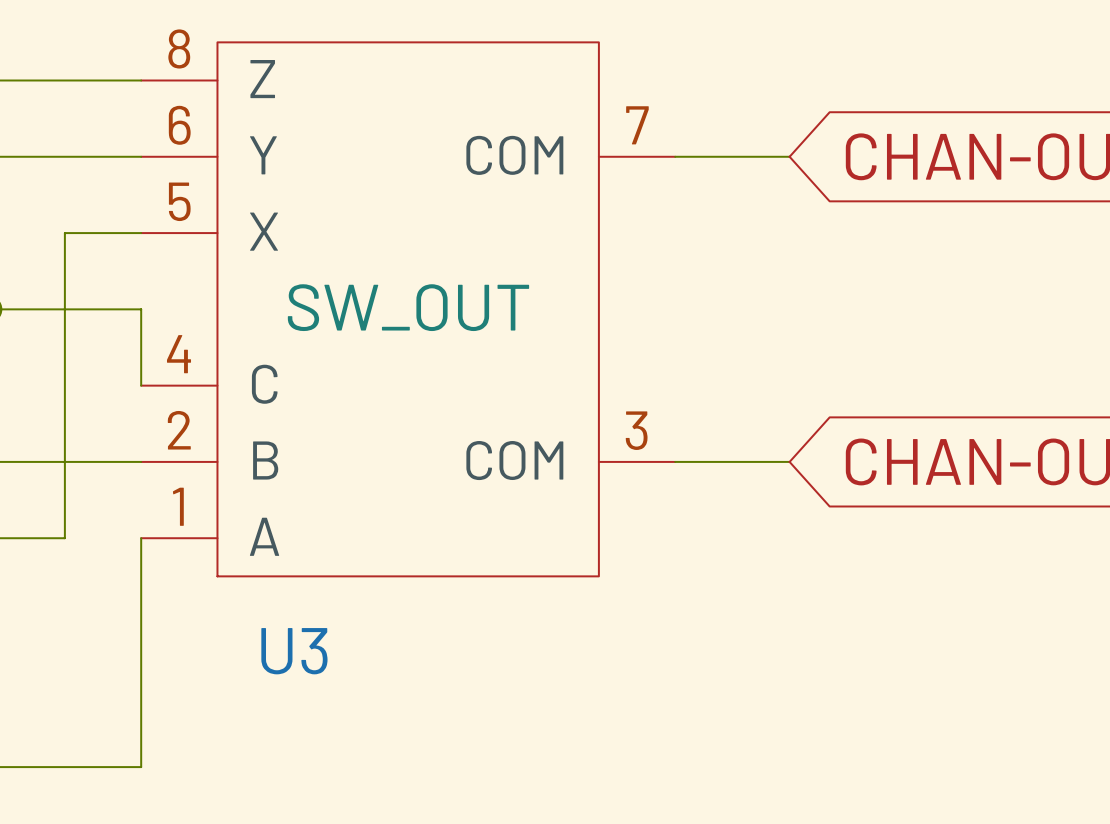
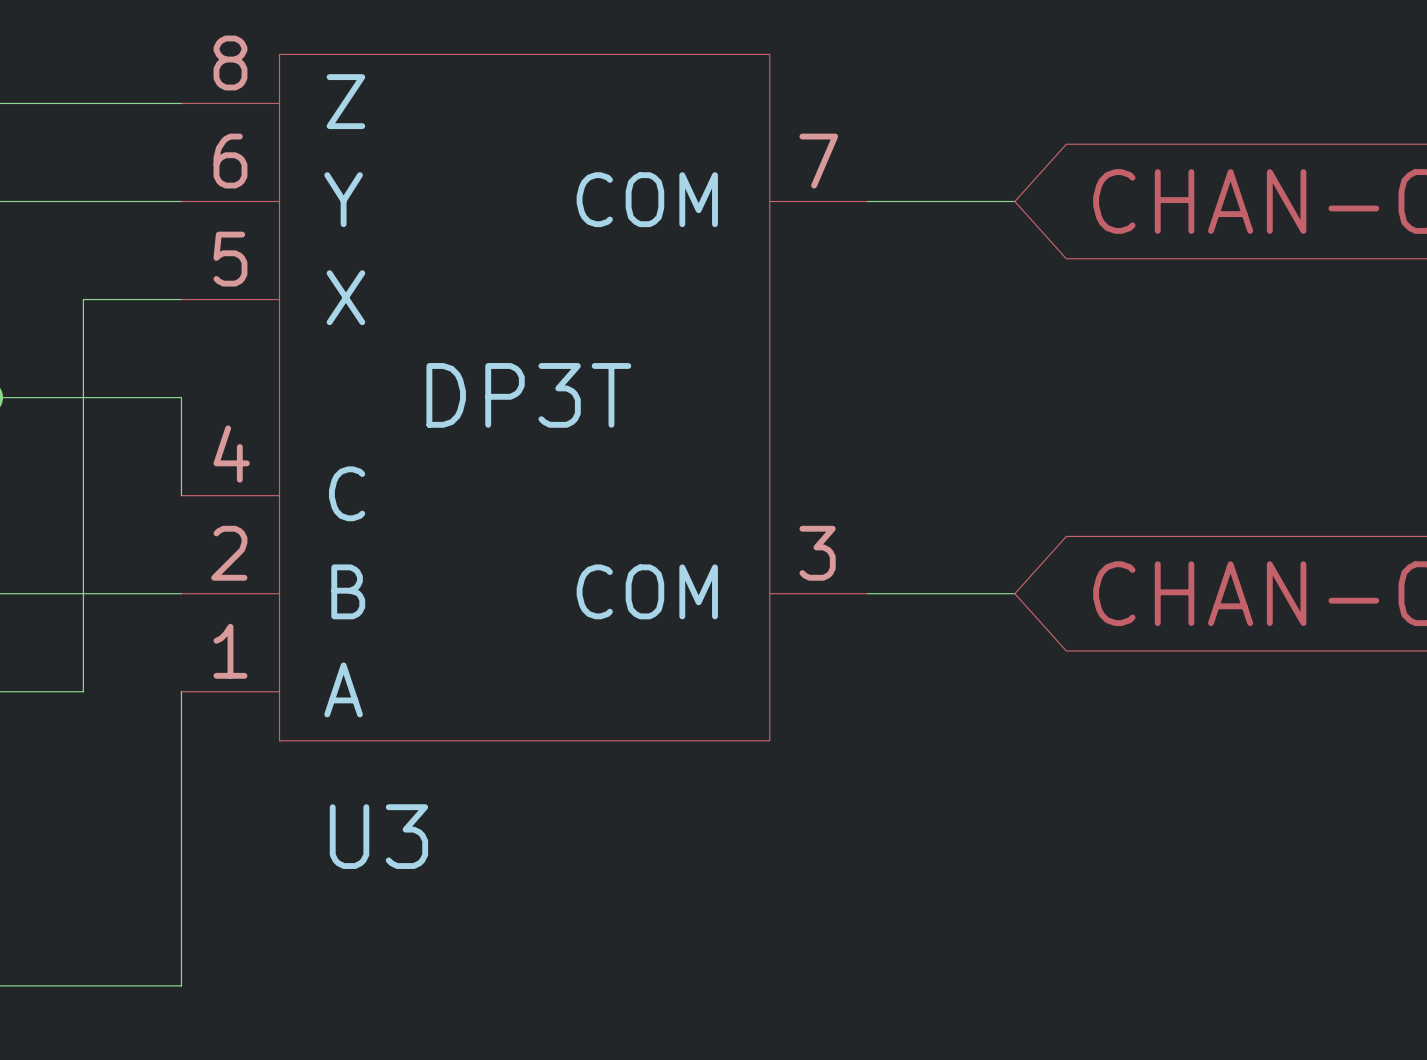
U3 value: SW_OUT (408, 307) -> DP3T (528, 395)

